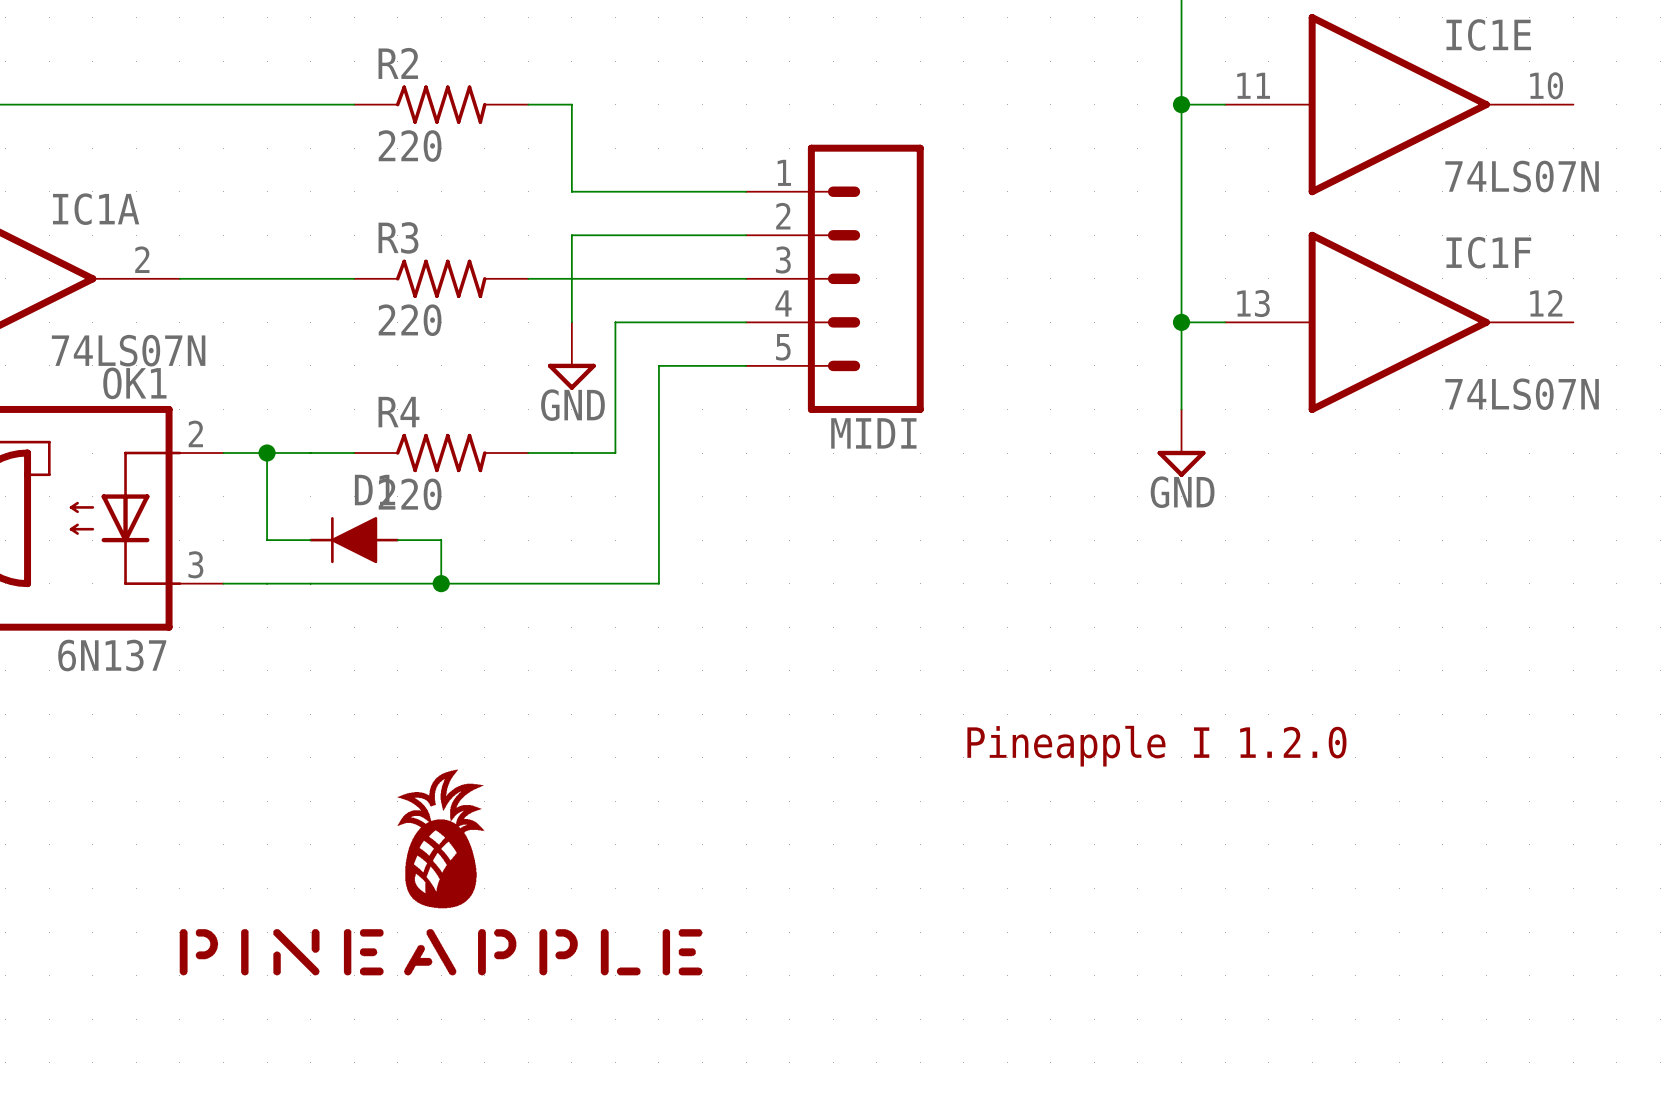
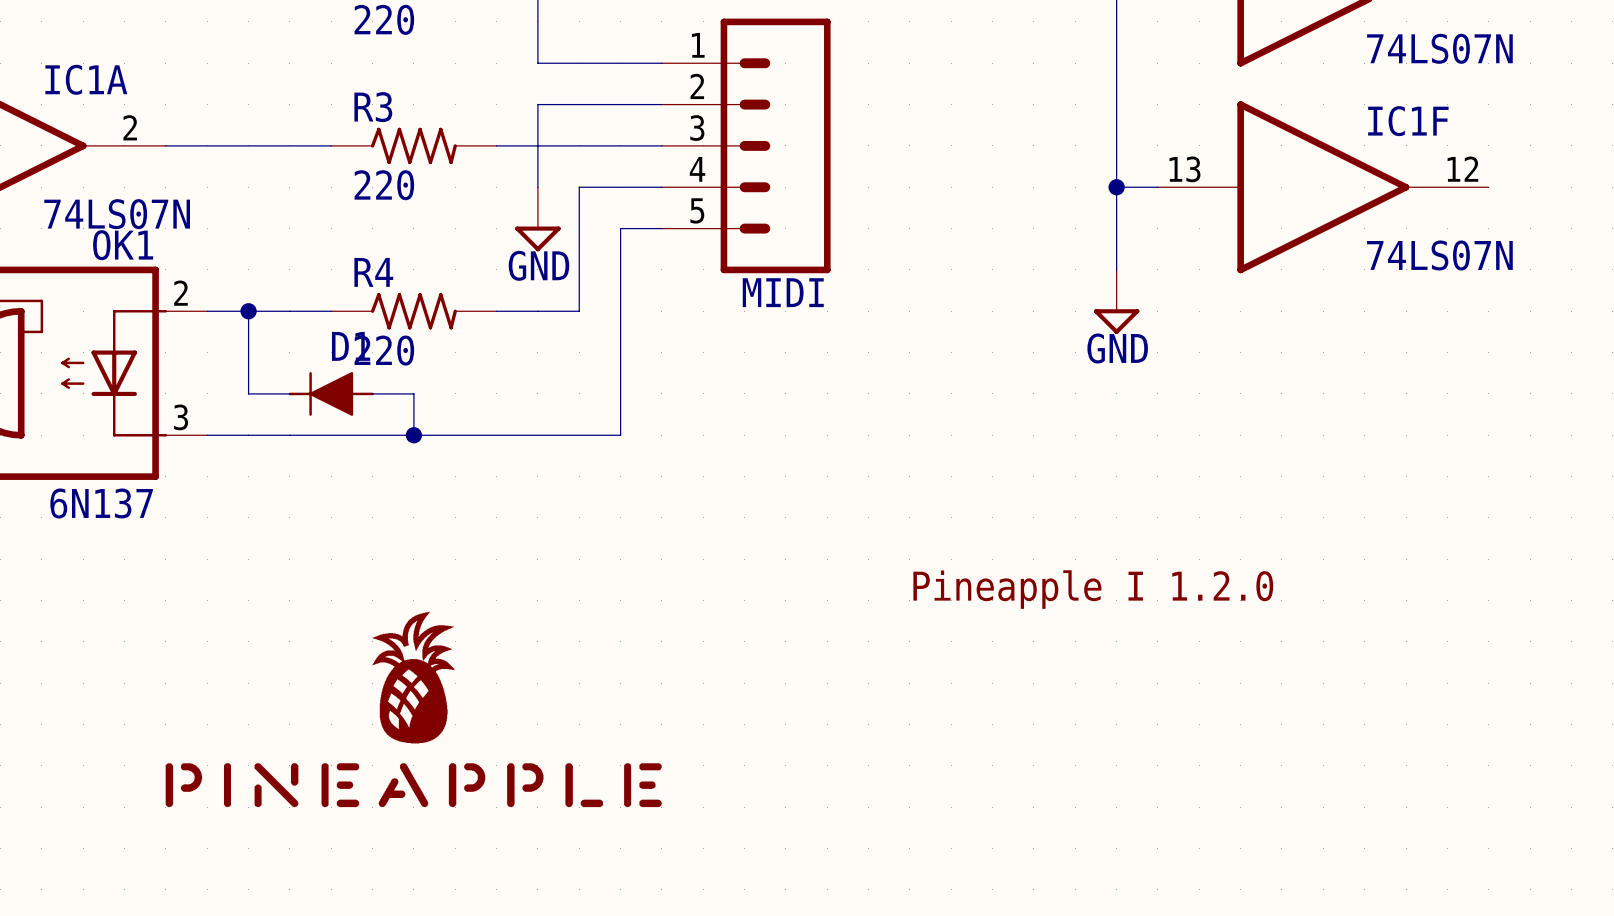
MIDI position: (834, 278) -> (746, 145)

